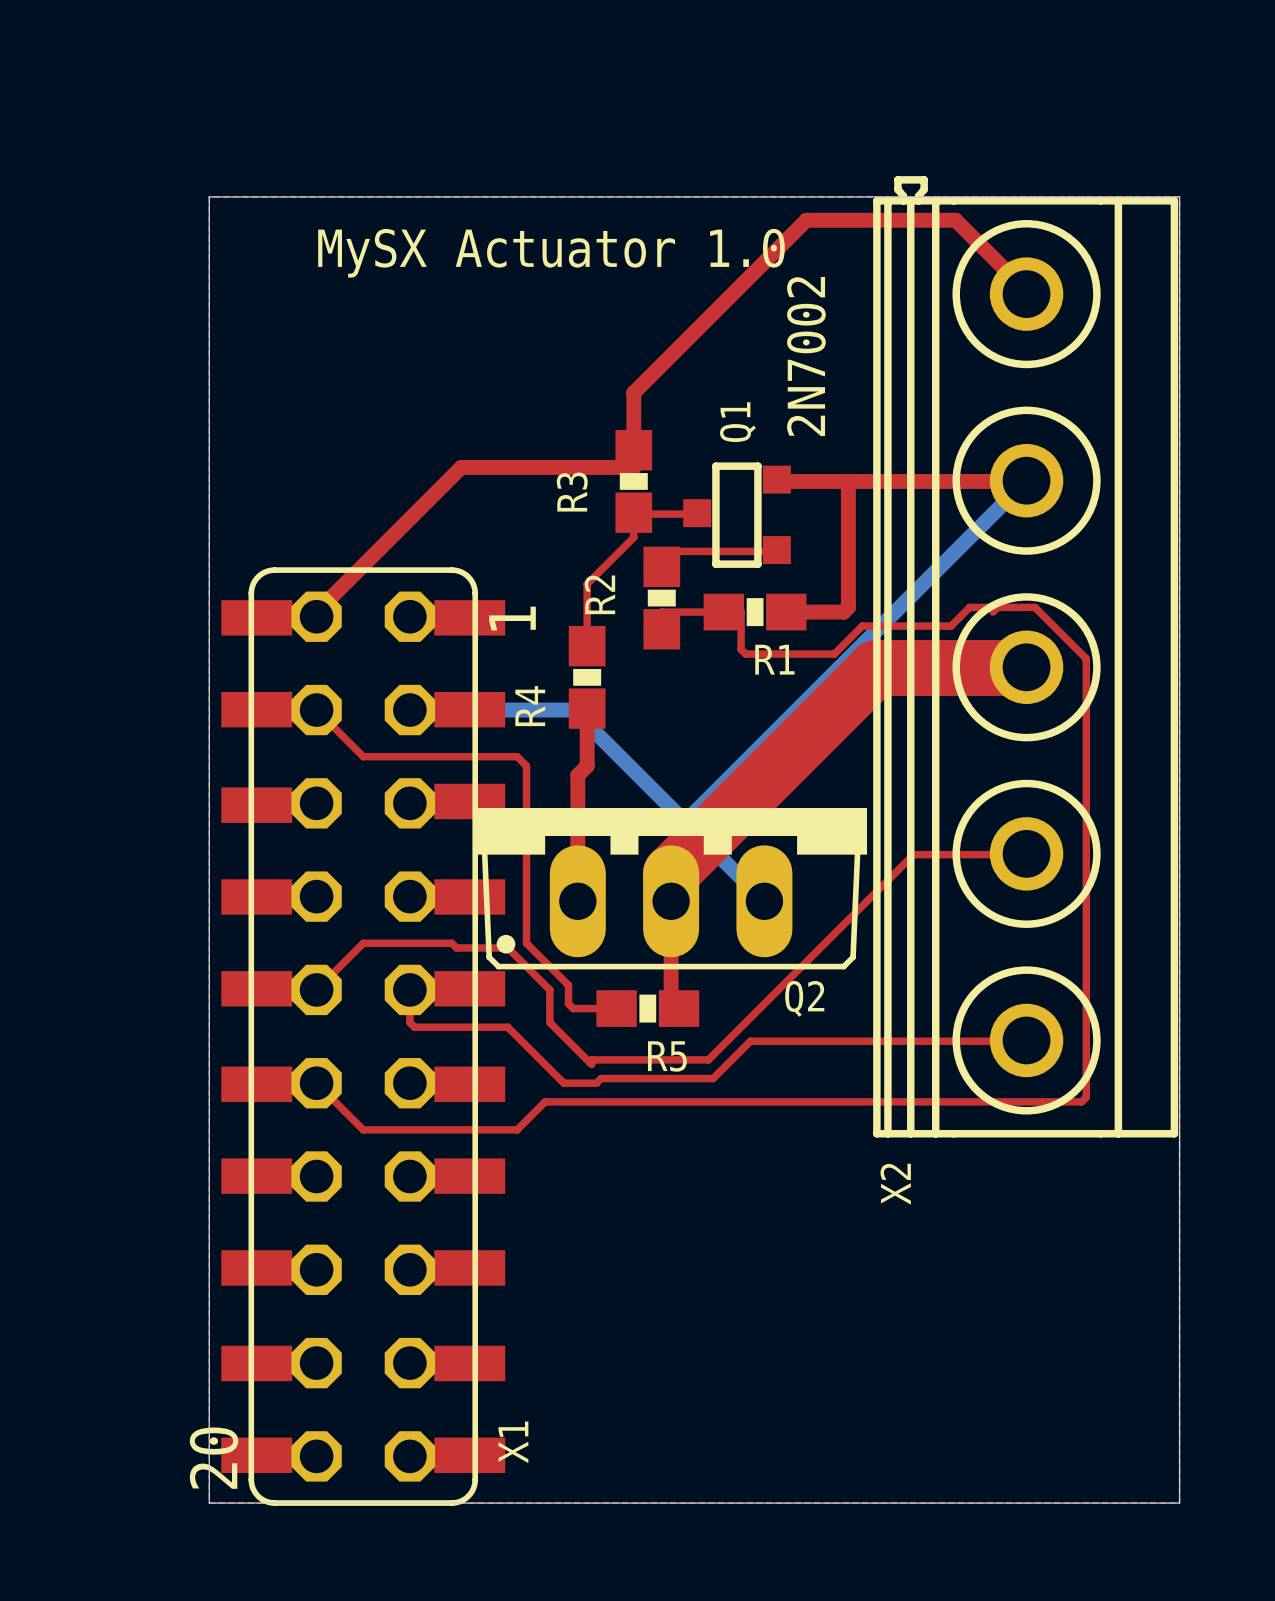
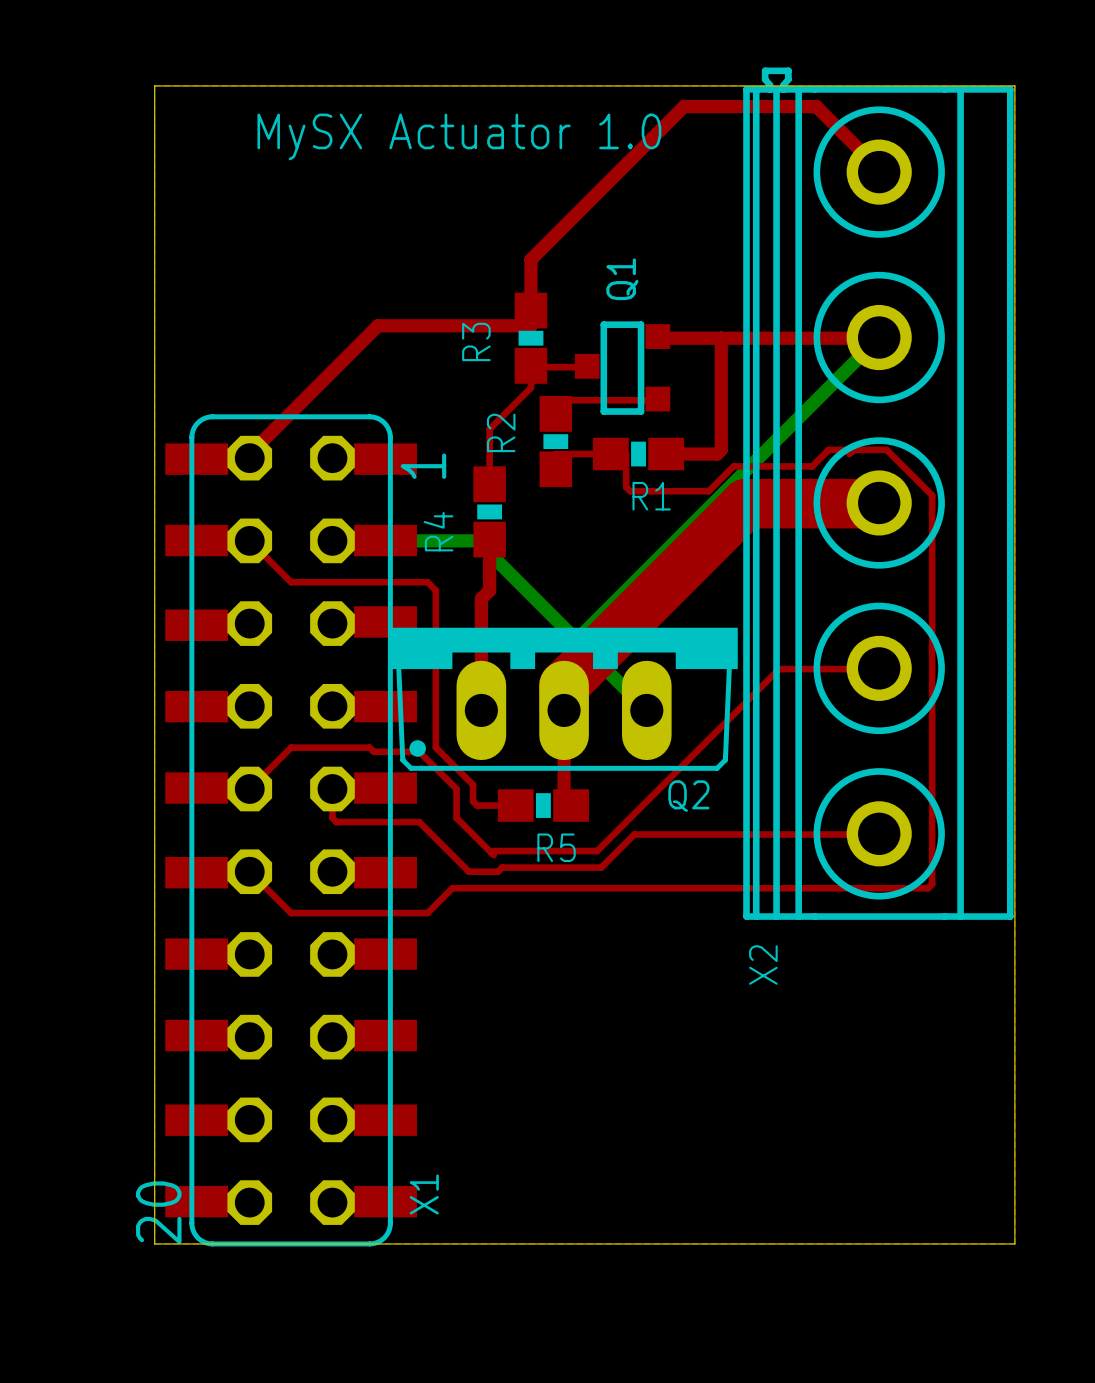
Q1 value: 2N7002 (806, 356) -> none

